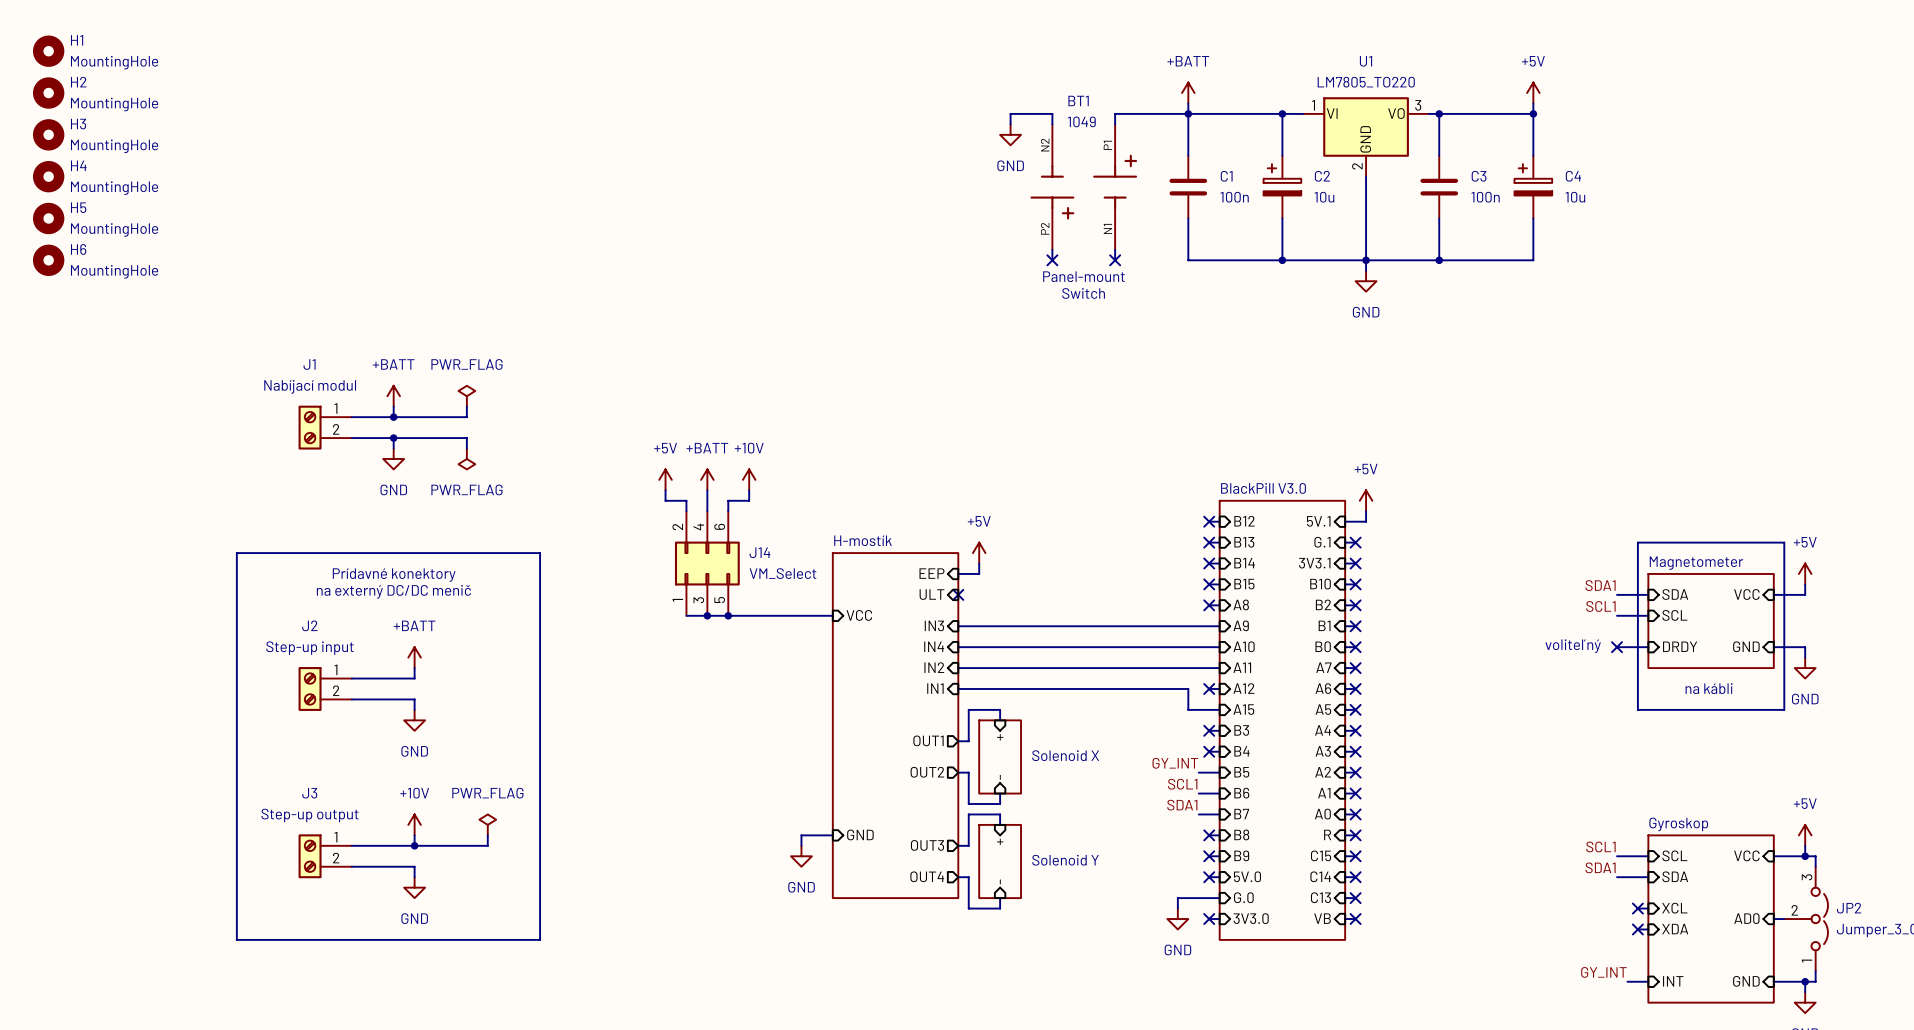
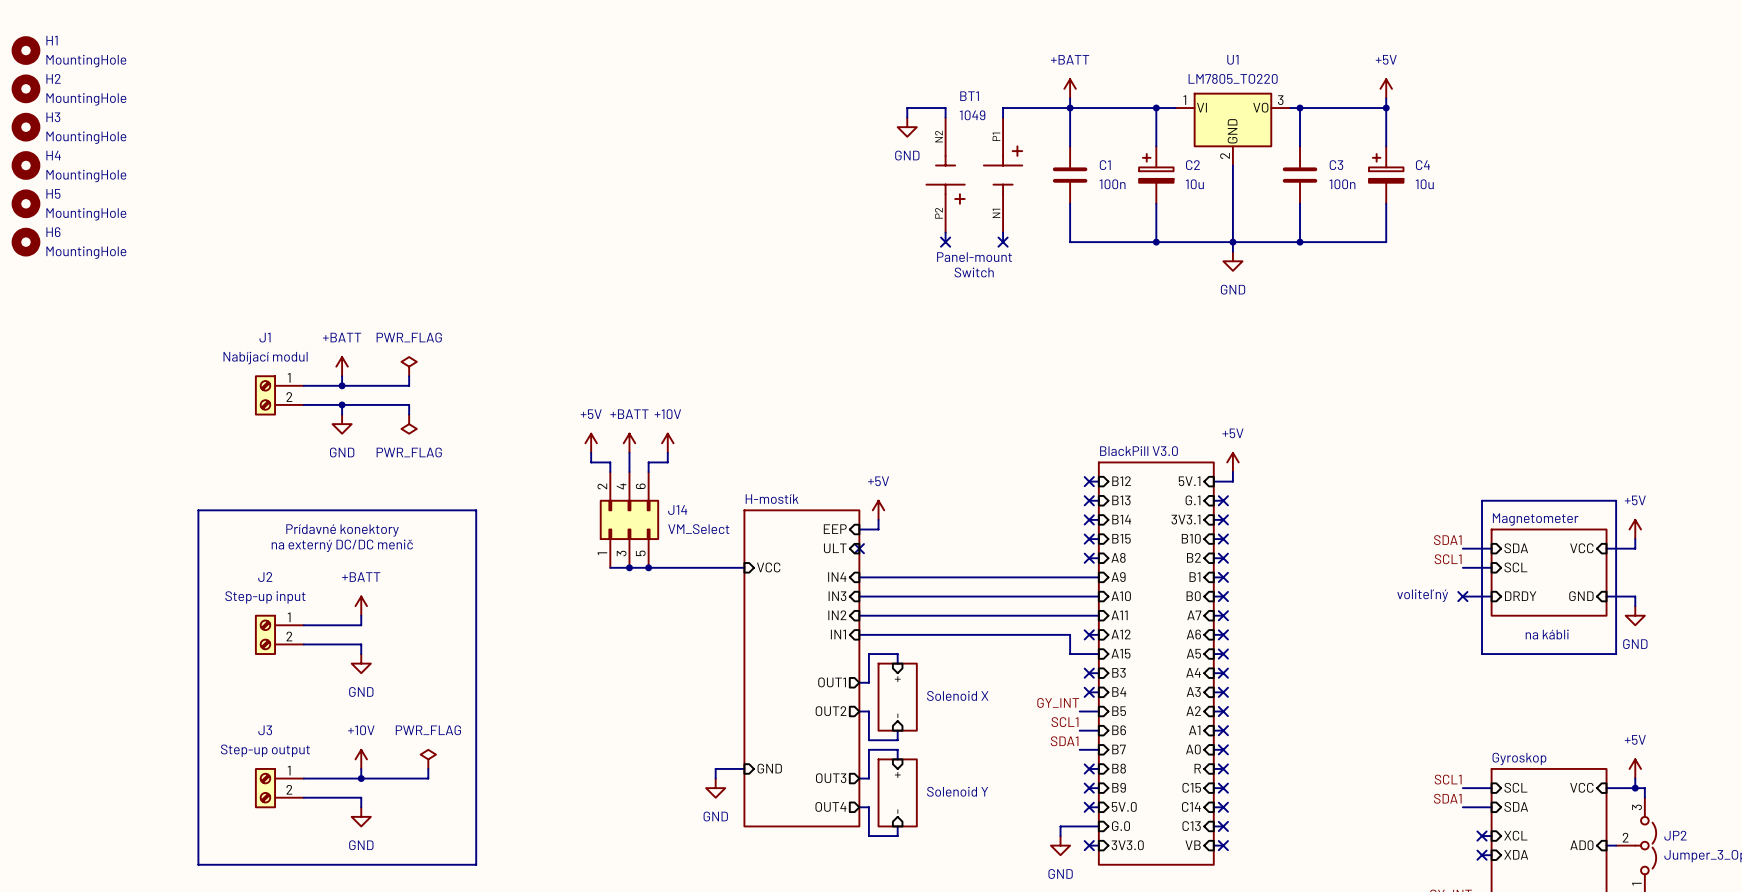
sheet pin: IN3 (934, 625) -> IN4 (837, 577)
sheet pin: IN4 (934, 646) -> IN3 (837, 596)

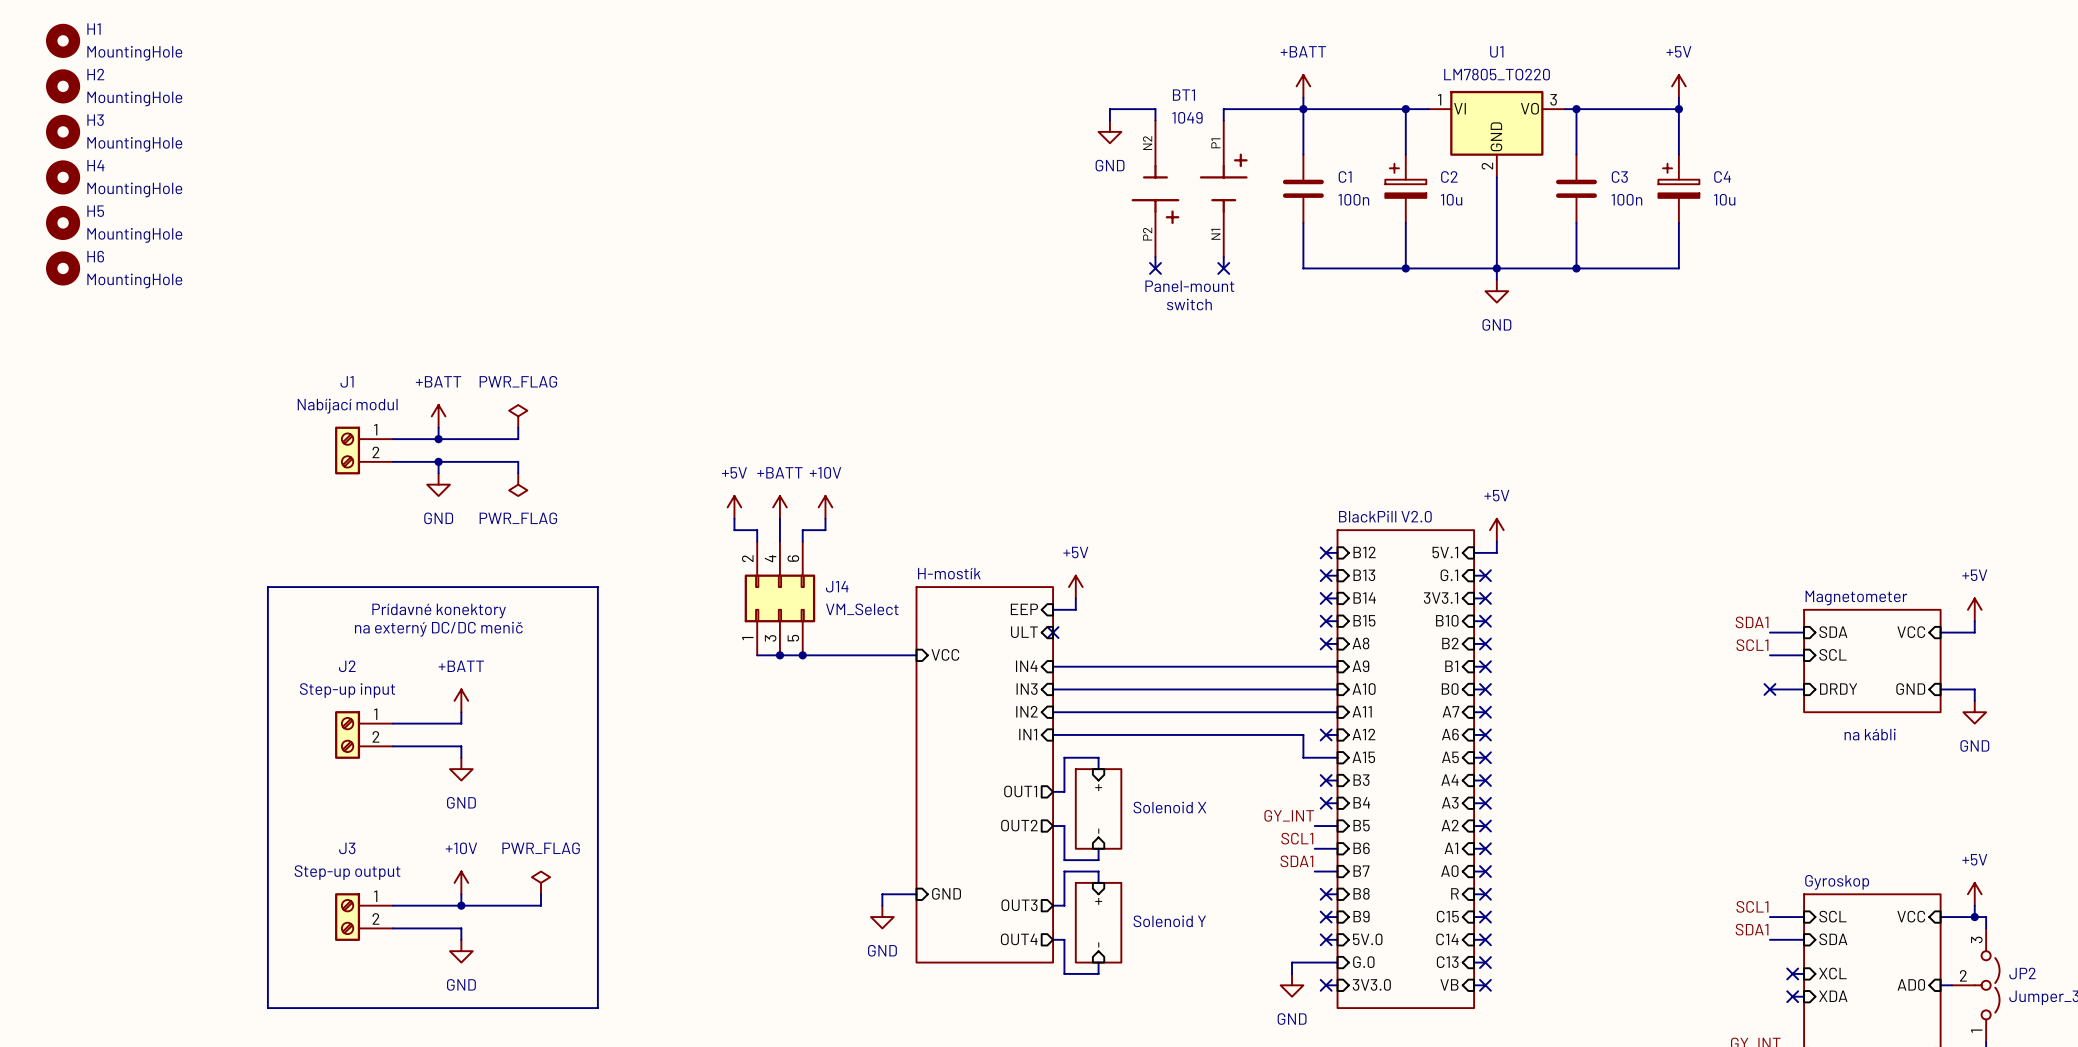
text: Switch (974, 272) -> switch (1189, 304)
sheet BlackPill V3.0 name: BlackPill V3.0 (1138, 451) -> BlackPill V2.0 (1385, 516)
line: (1482, 500) (1616, 500) (1616, 654) (1482, 654) (1482, 500) -> none
text: voliteľný (1422, 595) -> none

